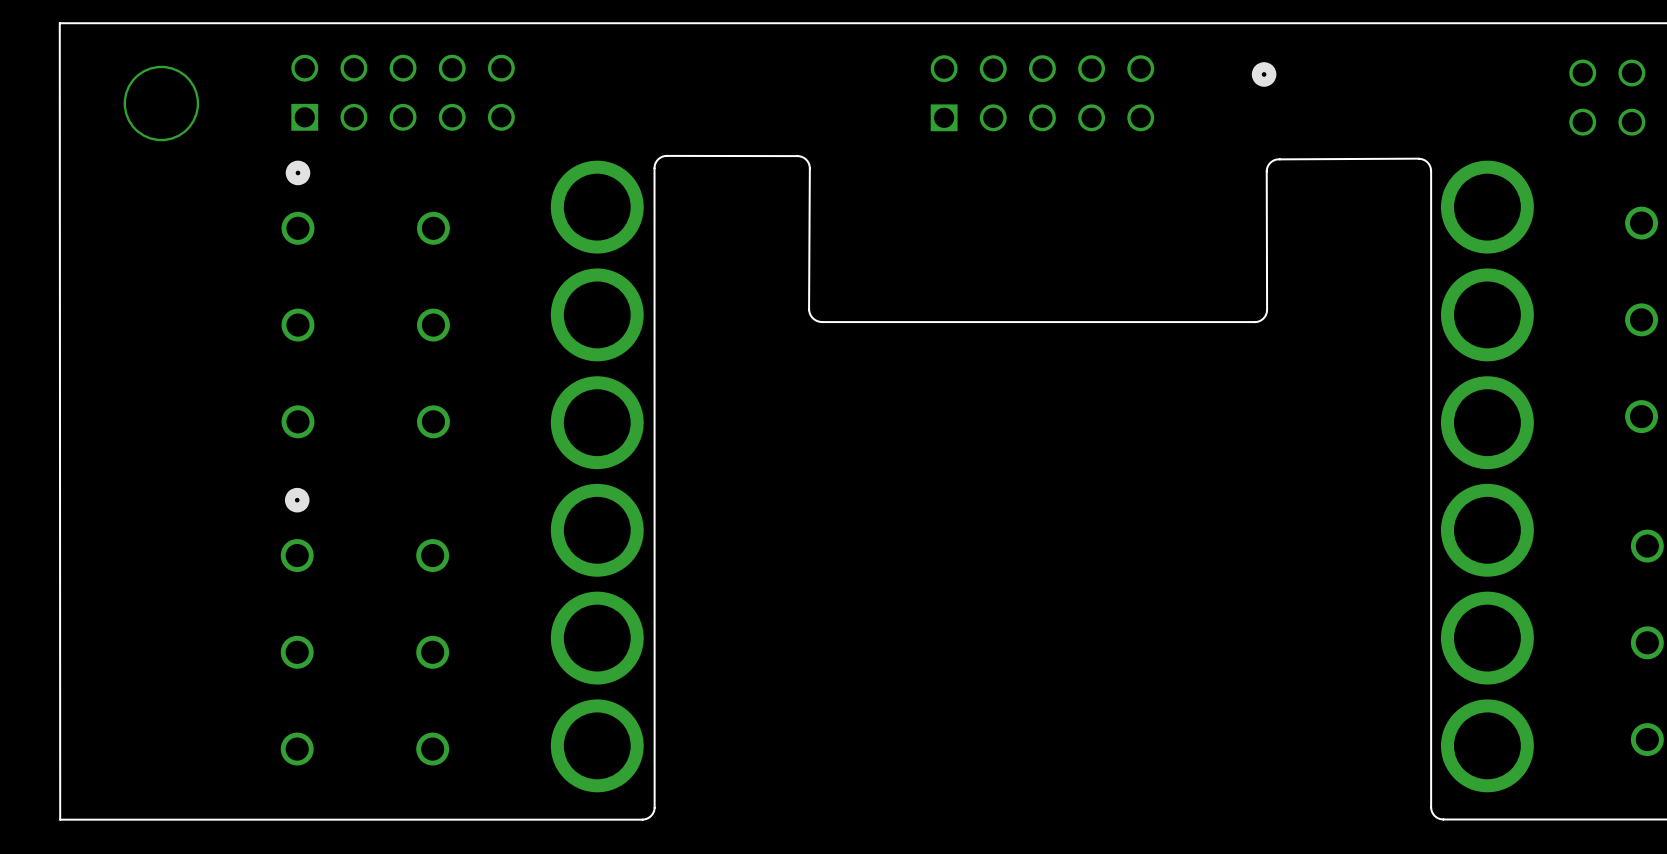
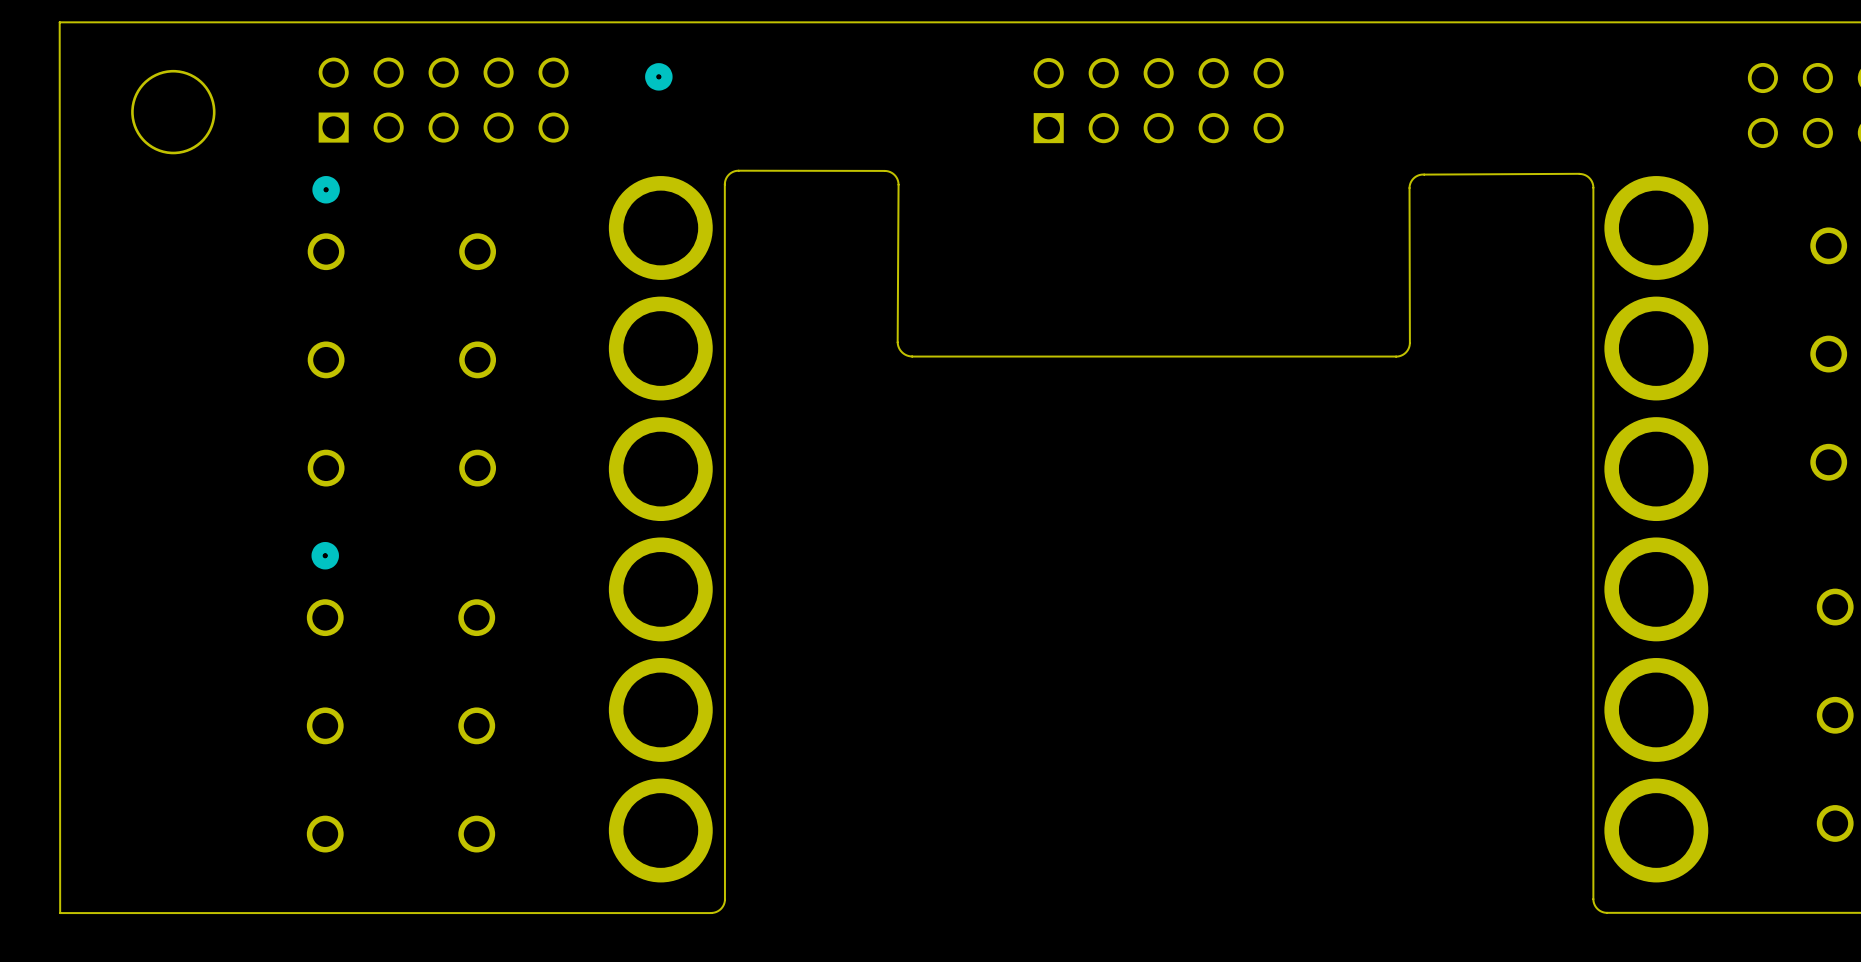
part: none -> (658, 76)
part: (1264, 74) -> none

